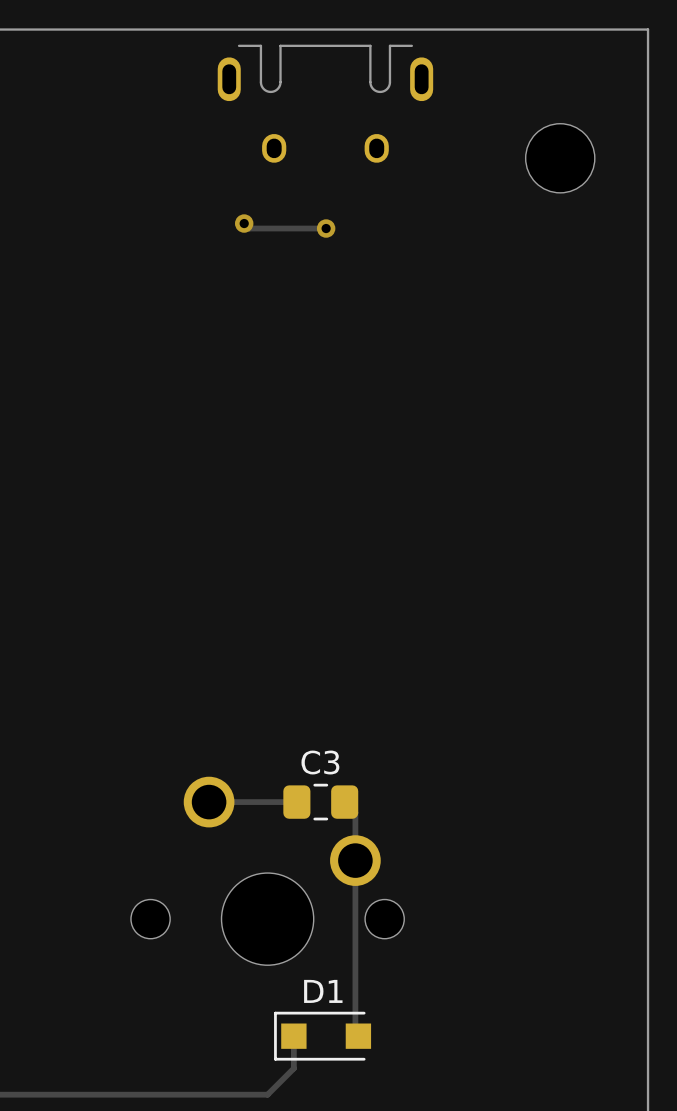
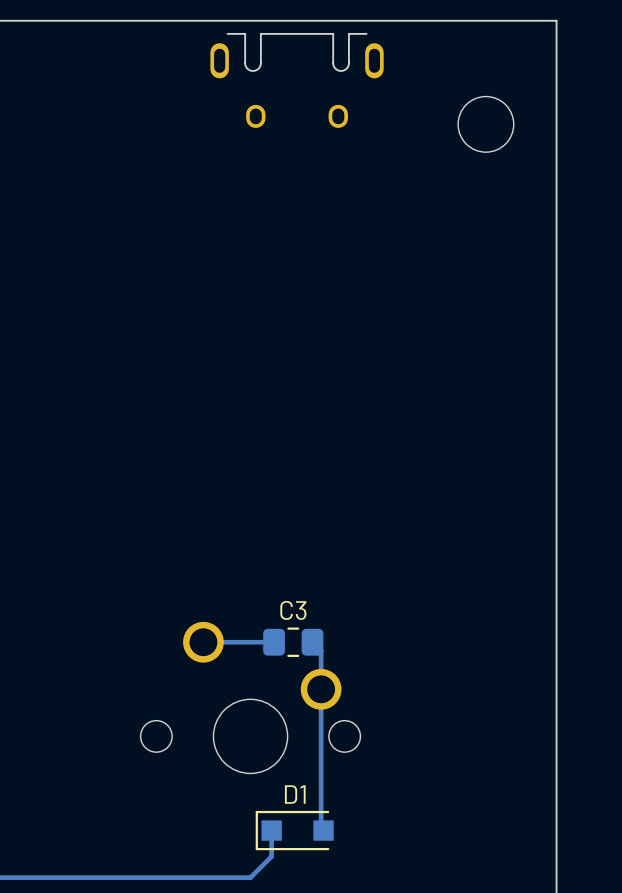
track: (244, 223) (249, 228) (326, 228) -> none
via: (244, 223) -> none
via: (326, 228) -> none

